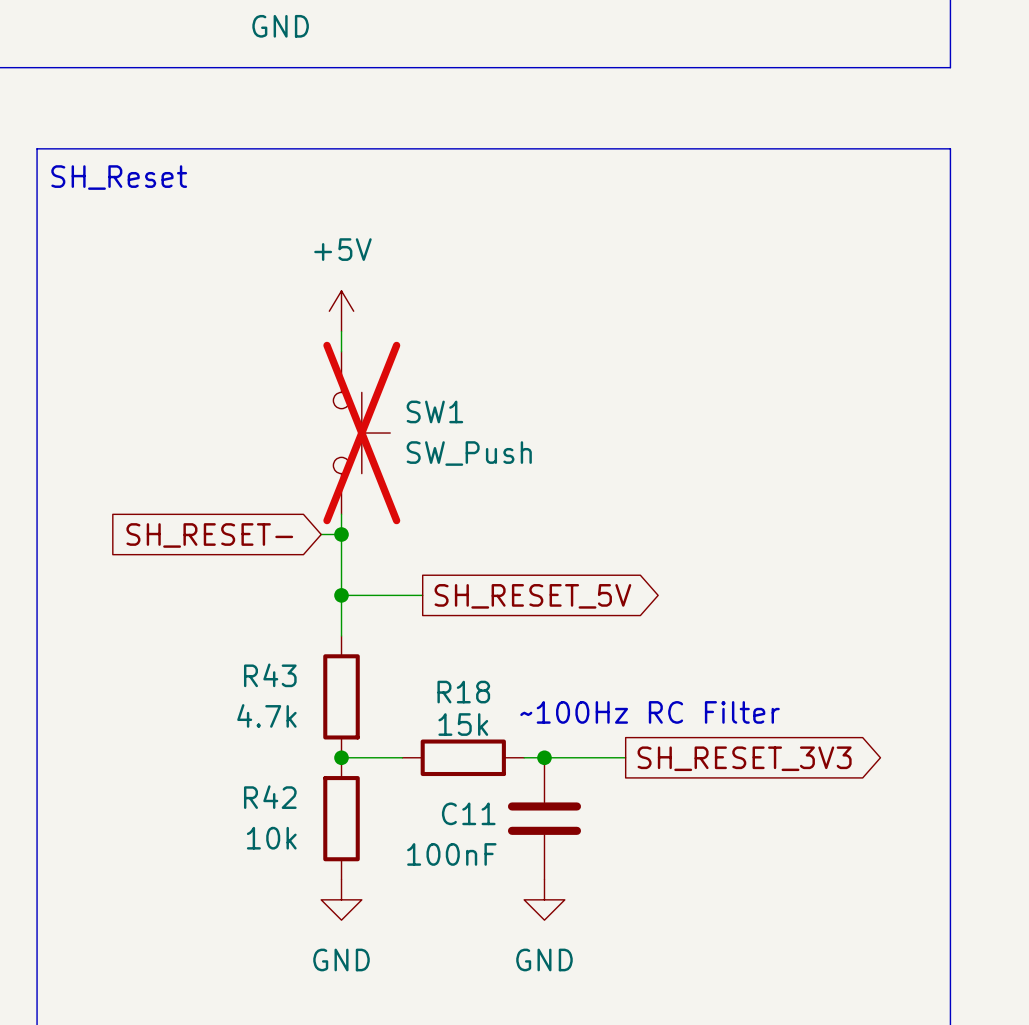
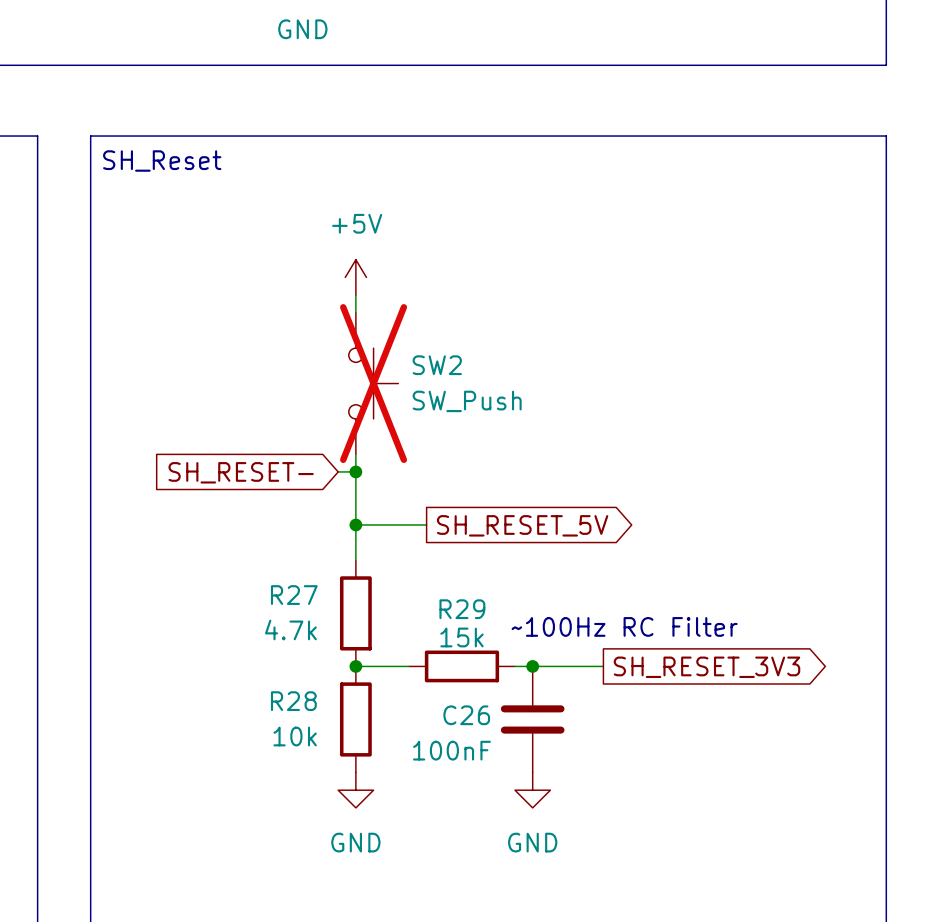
SW1 name: SW1 (434, 411) -> SW2 (437, 365)
R43 name: R43 (270, 675) -> R27 (294, 595)
R18 name: R18 (463, 692) -> R29 (462, 609)
R42 name: R42 (270, 797) -> R28 (293, 701)
C11 name: C11 (468, 813) -> C26 (466, 715)

